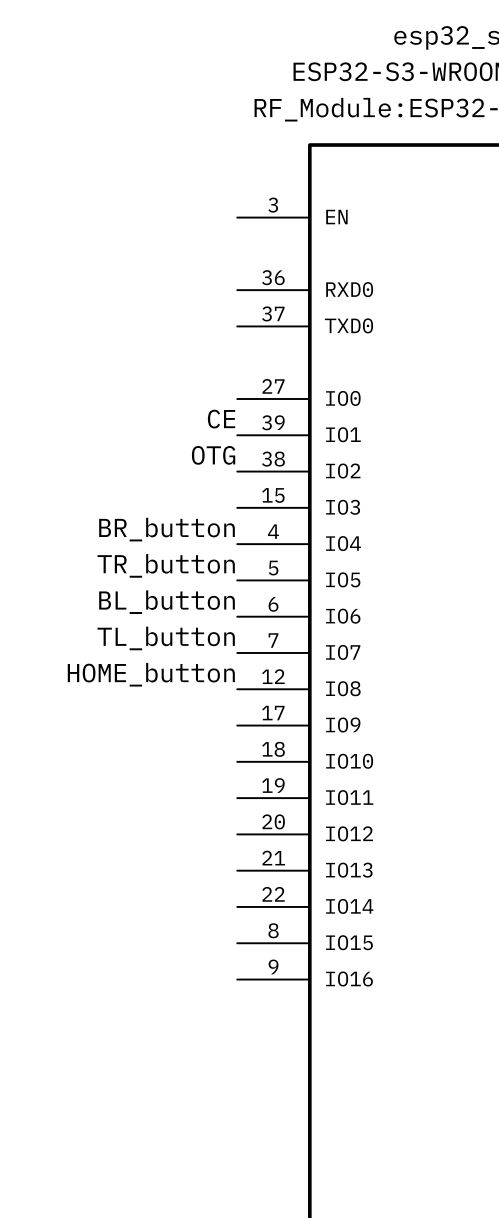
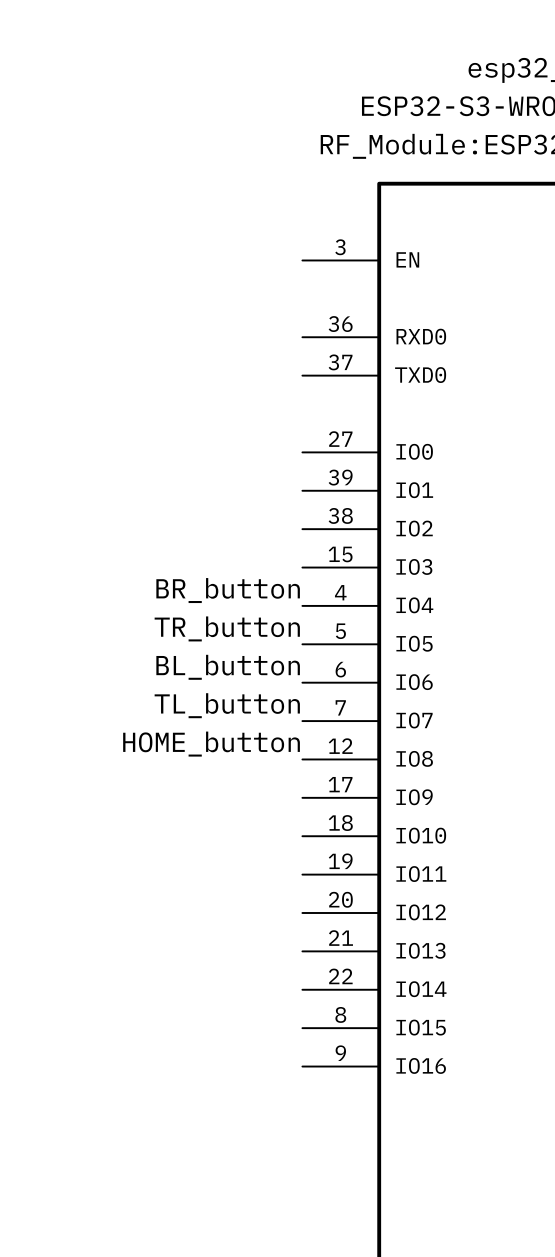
label: CE (221, 419) -> none
label: OTG (213, 455) -> none

